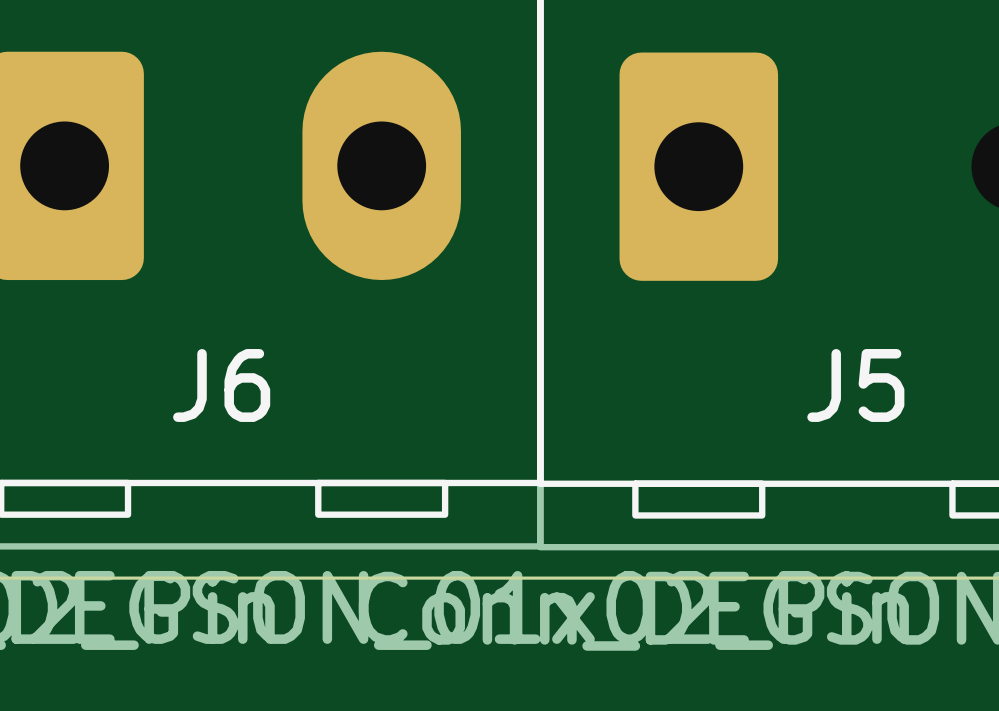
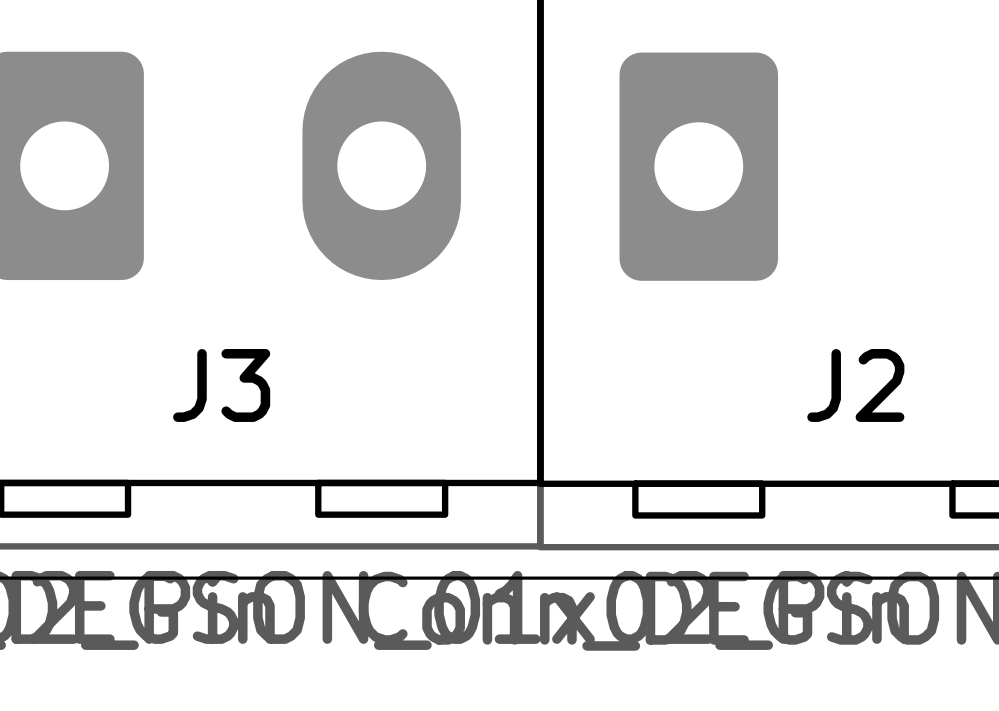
J6 name: J6 (221, 385) -> J3 (221, 385)
J5 name: J5 (855, 385) -> J2 (855, 385)

